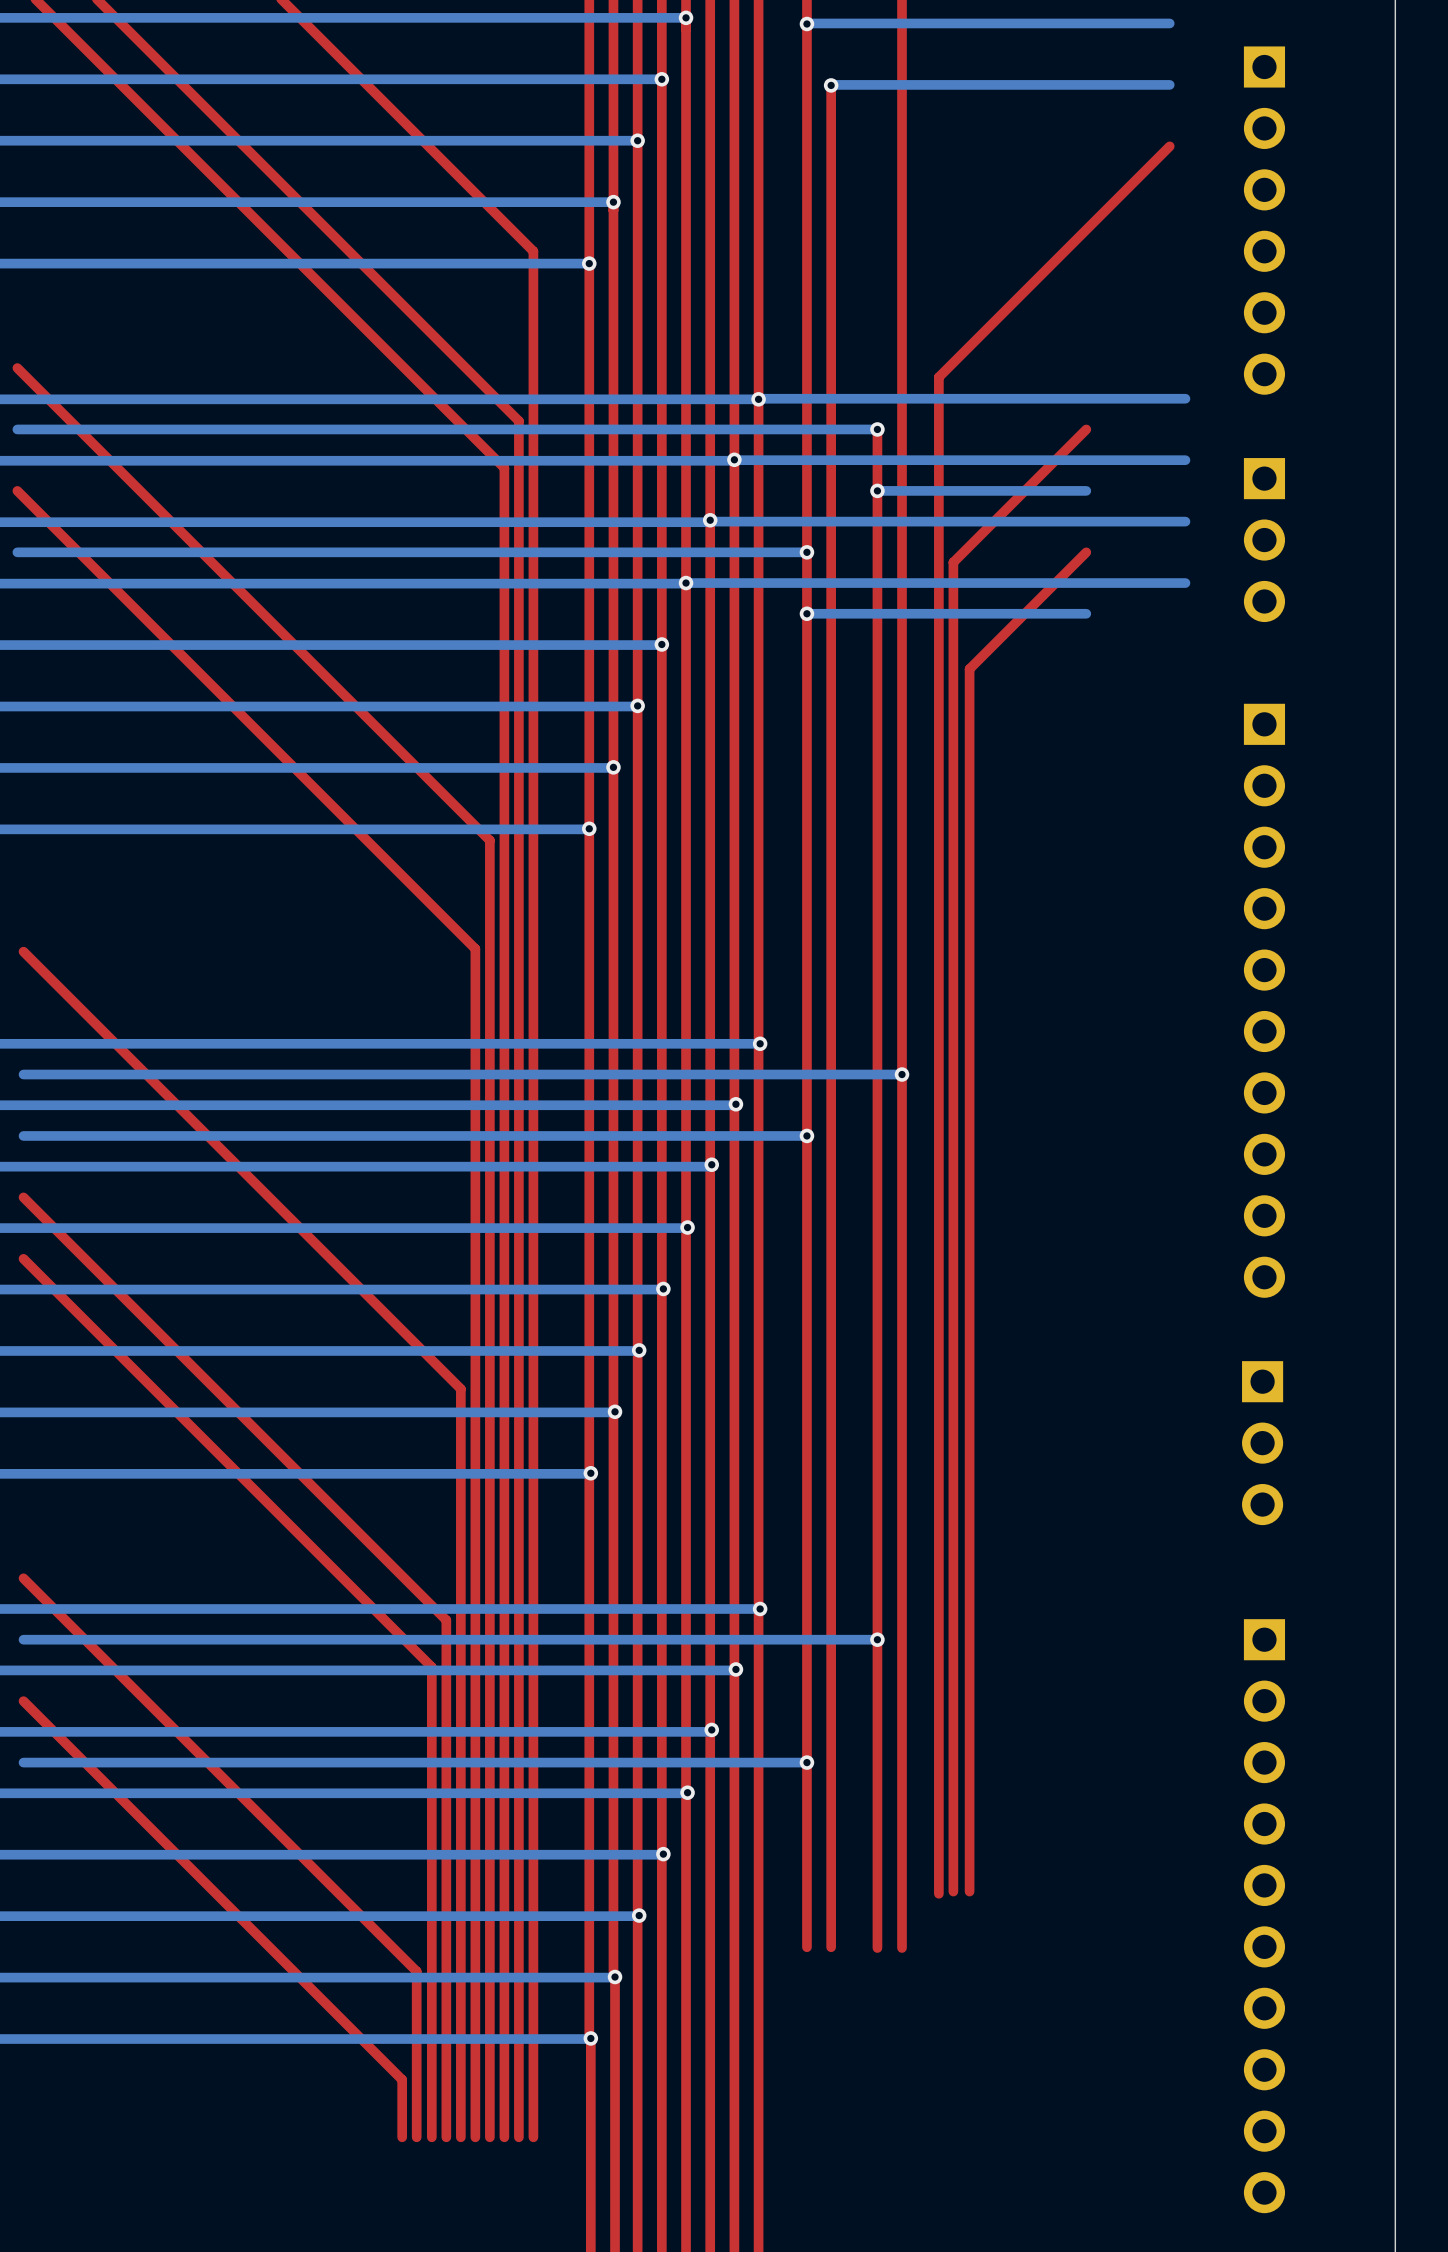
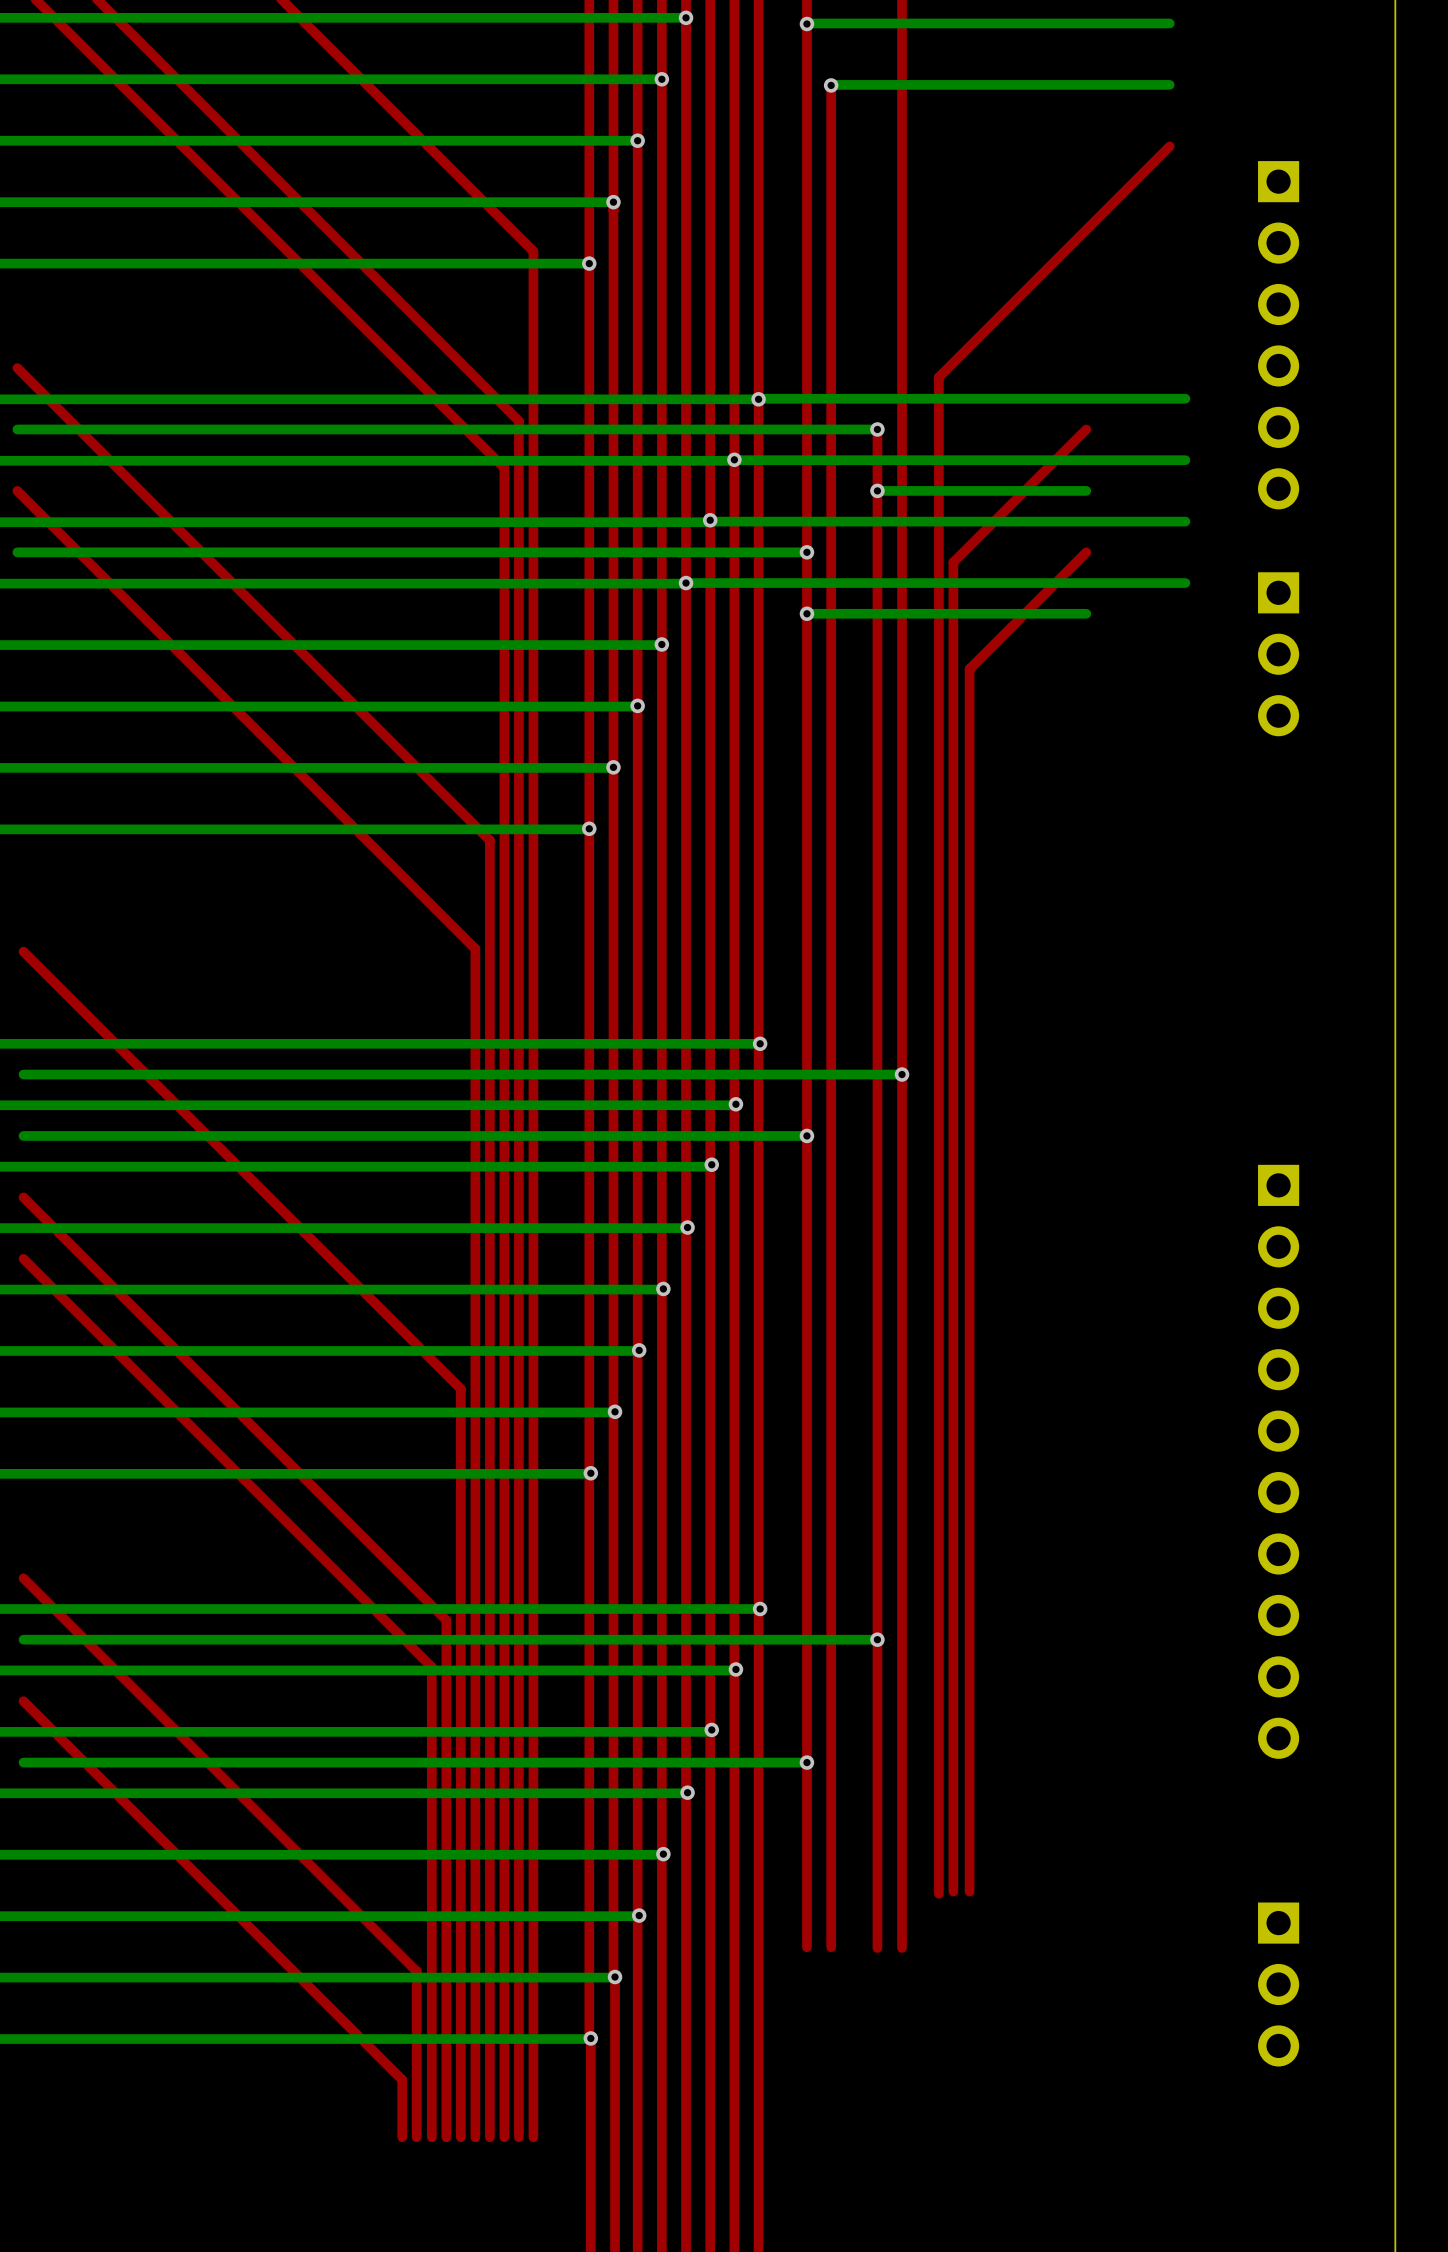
part position: (1264, 220) -> (1278, 335)
part position: (1264, 540) -> (1278, 654)
part: (1264, 1000) -> none
part: (1262, 1443) -> none
part: none -> (1278, 1461)
part: (1264, 1916) -> none
part: none -> (1278, 1984)

